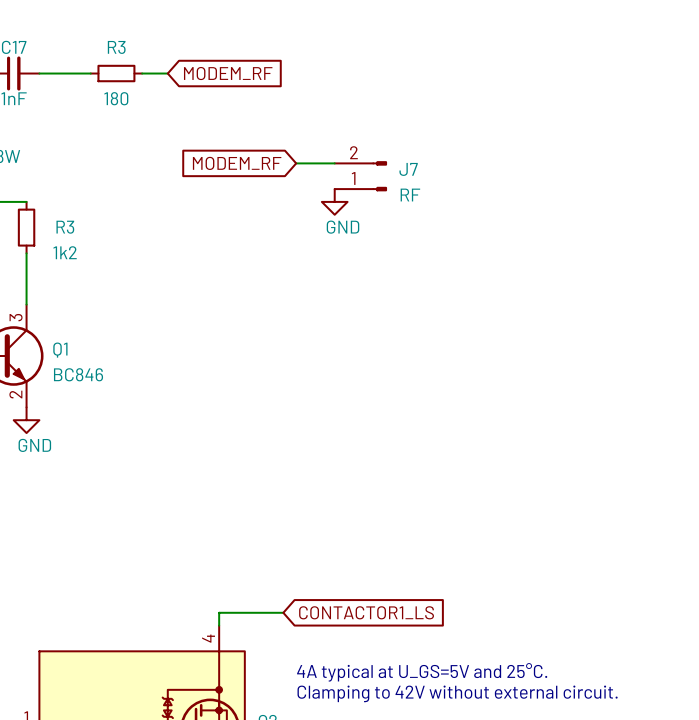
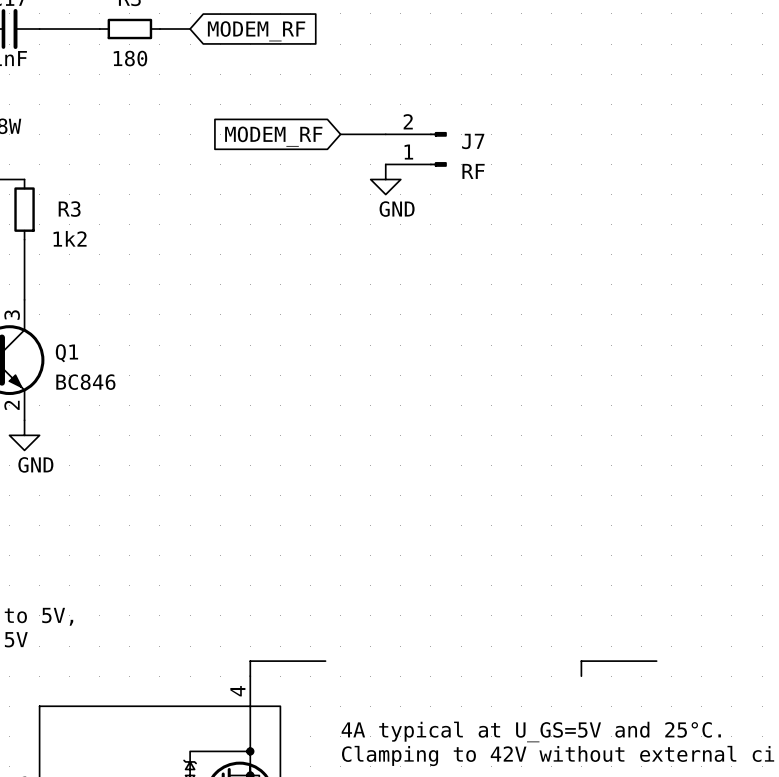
global label: CONTACTOR1_LS (366, 612) -> none
wire: none -> (656, 661) (581, 661) (581, 676)

